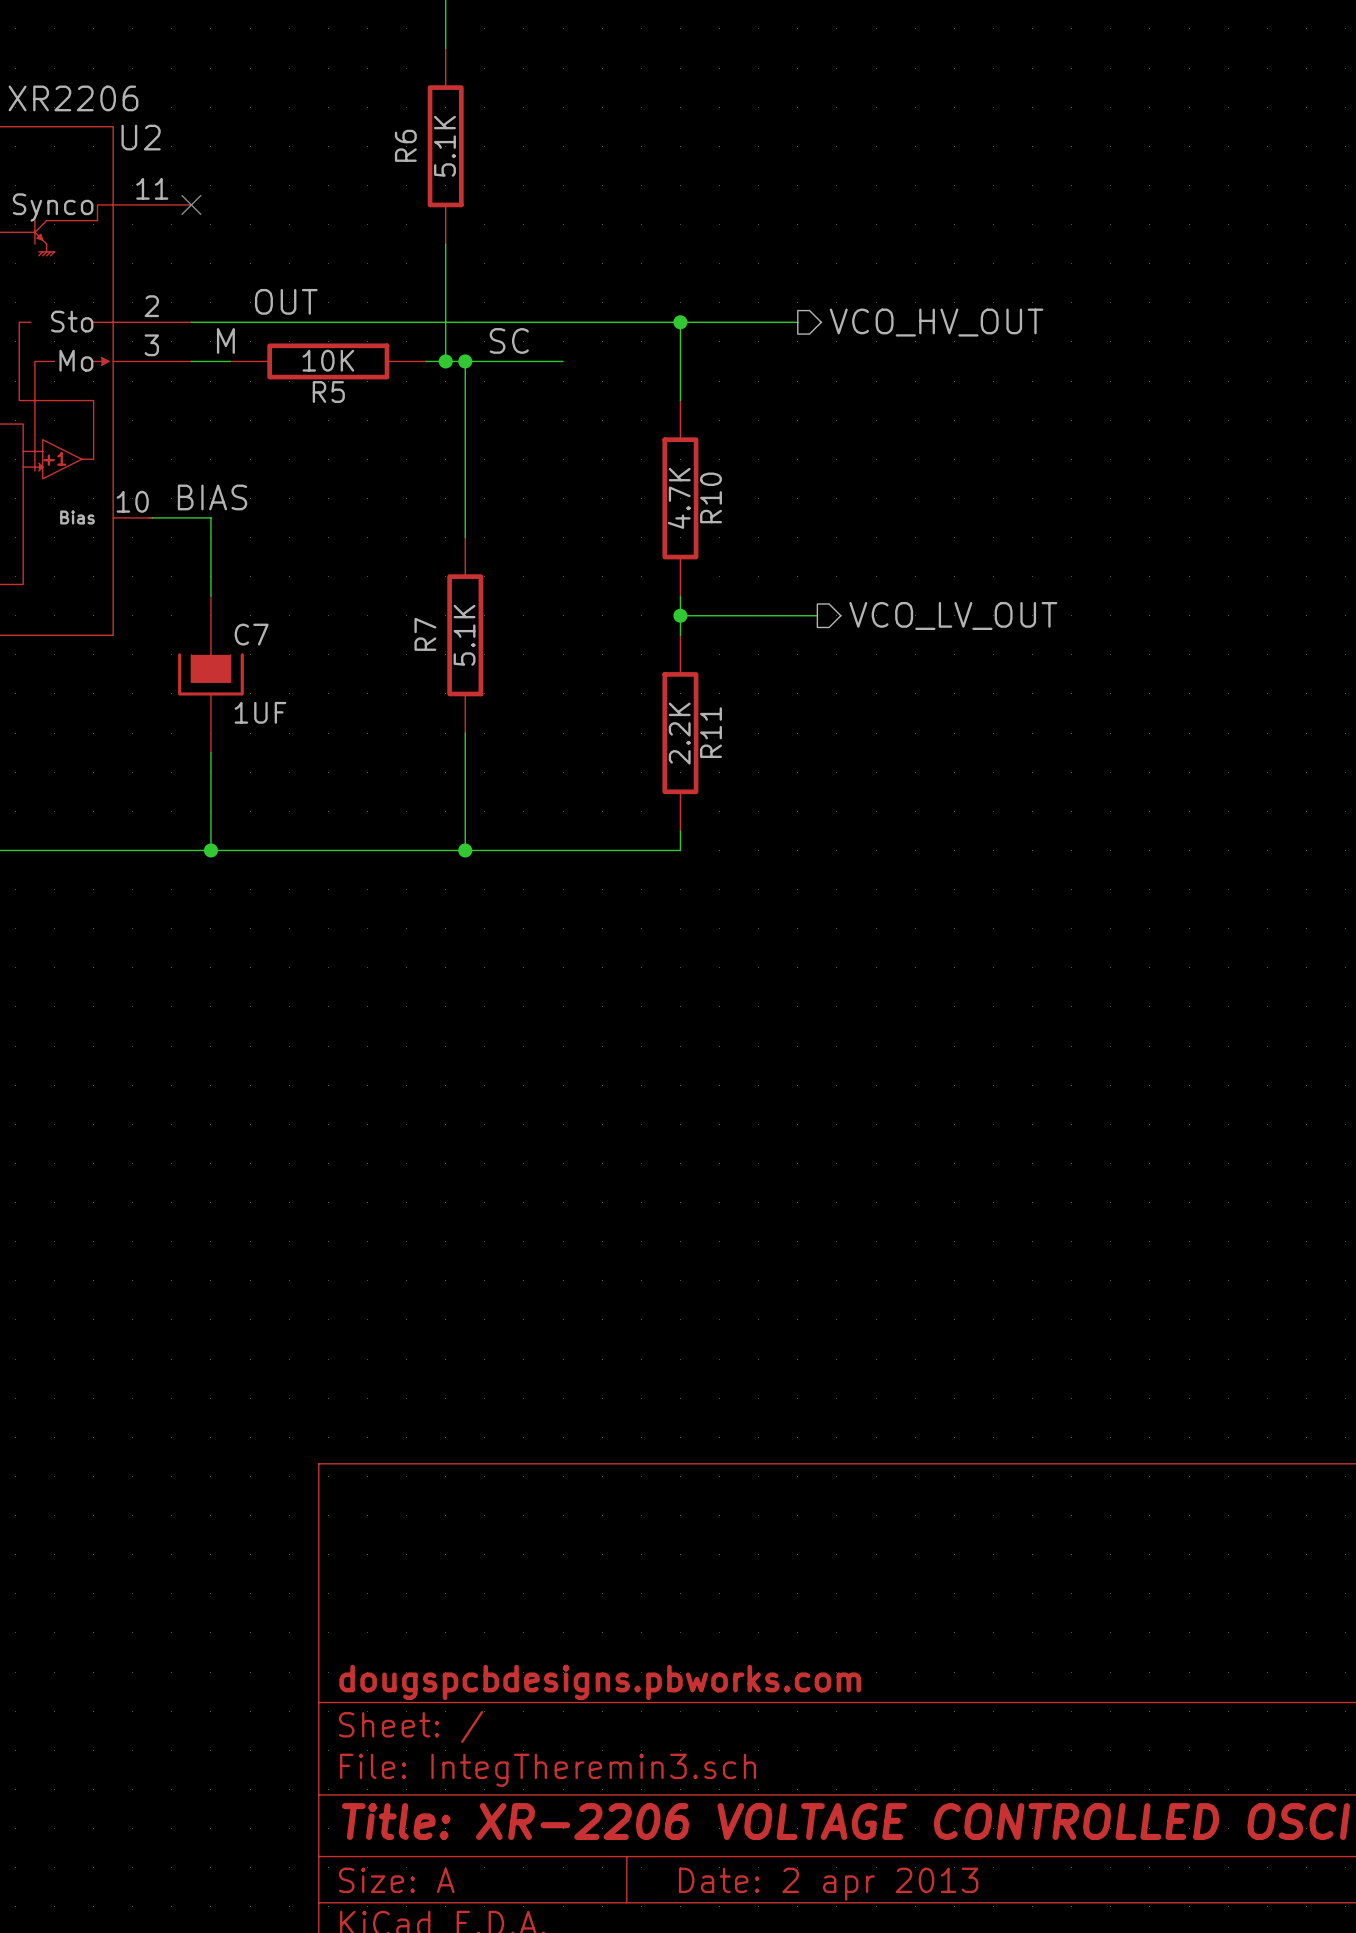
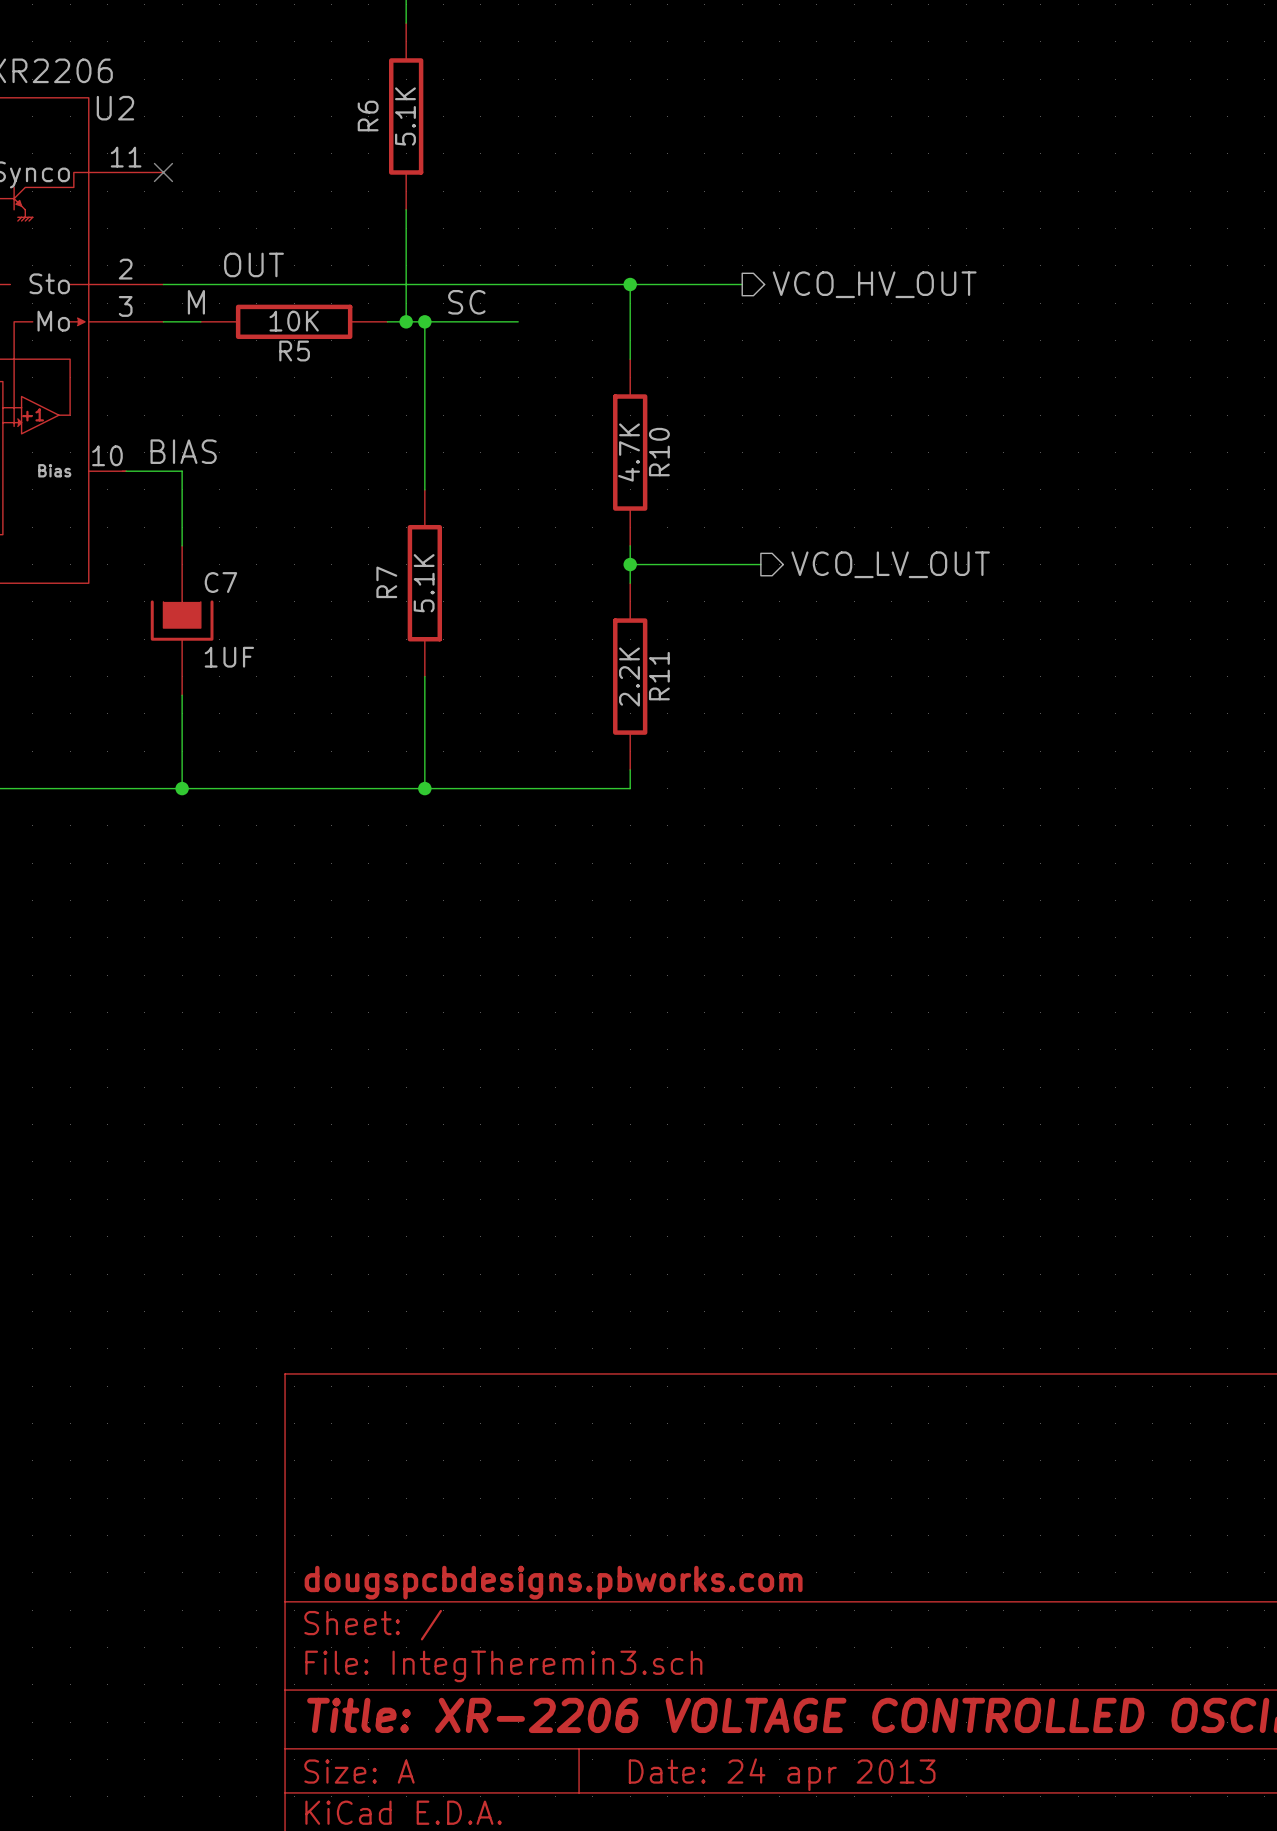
title block: Date: 2 apr 2013 (828, 1884) -> Date: 24 apr 2013 (782, 1774)

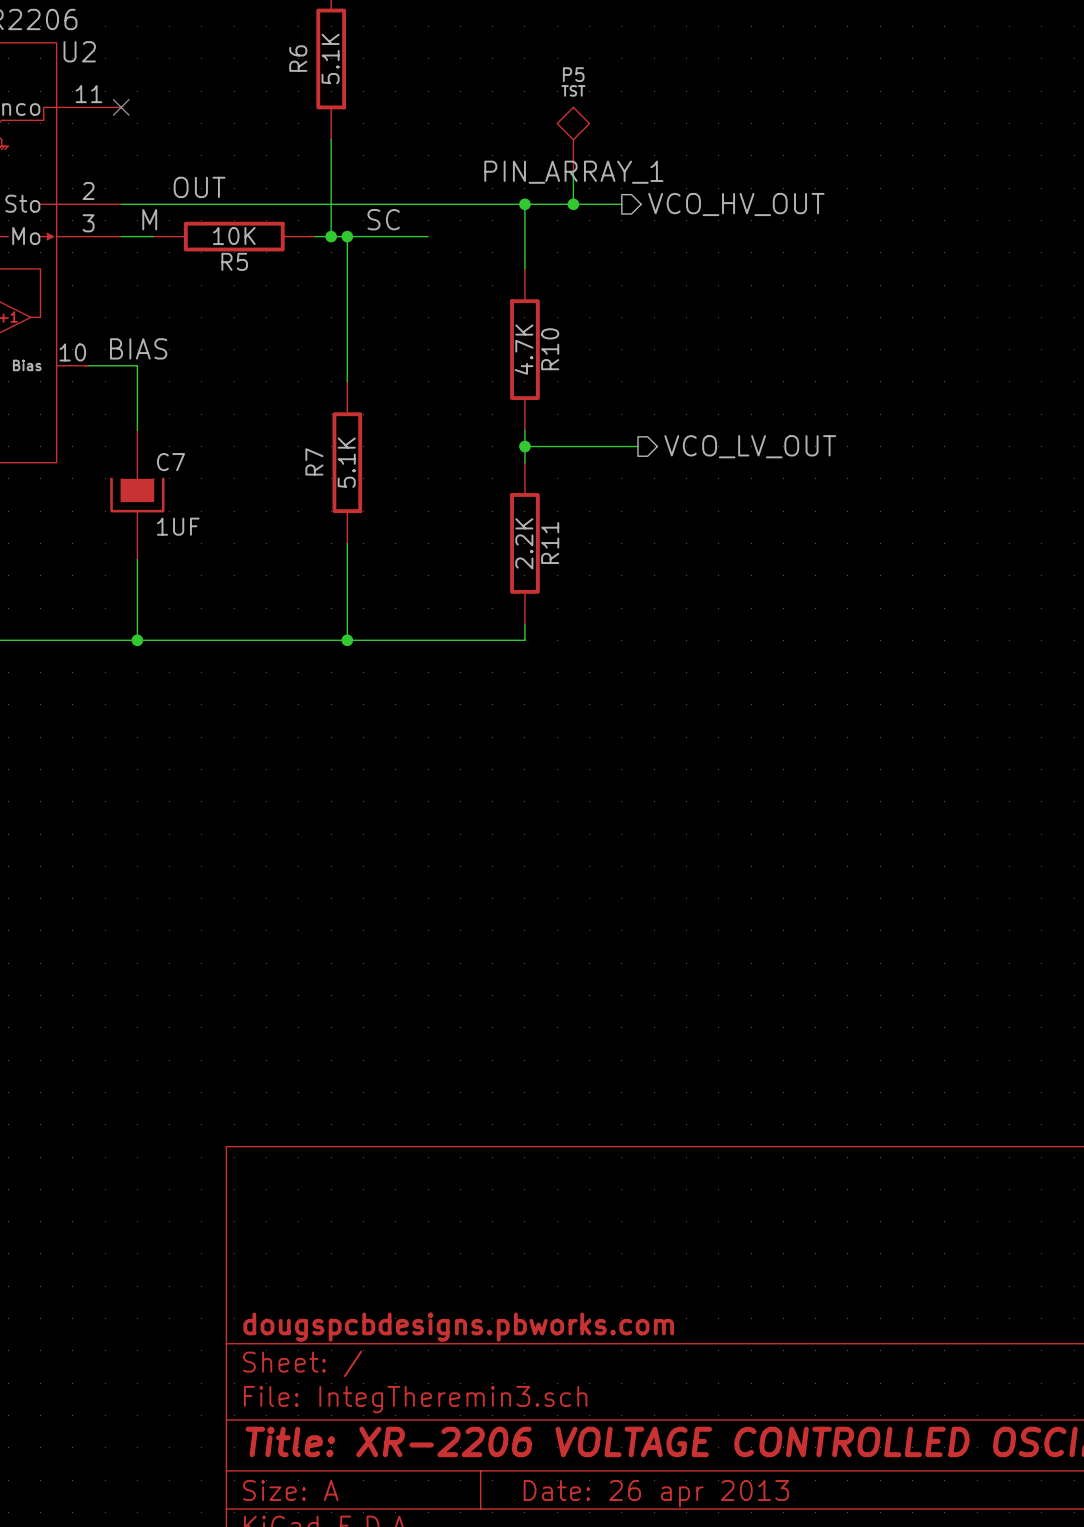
P5: none -> TST (573, 139)
wire: none -> (573, 172) (573, 204)
junction: none -> (573, 204)
title block: Date: 24 apr 2013 (782, 1774) -> Date: 26 apr 2013 (656, 1493)

